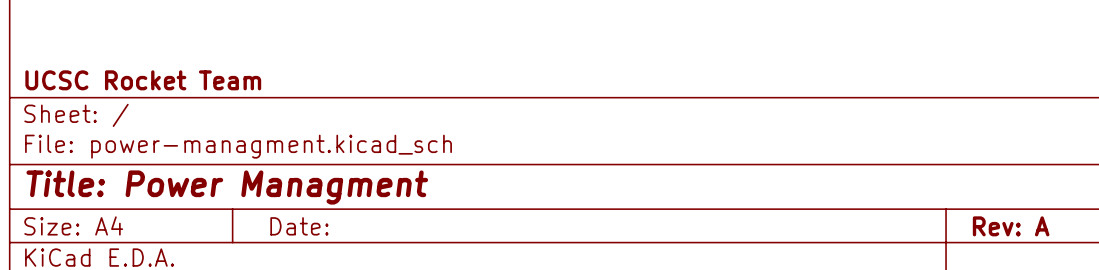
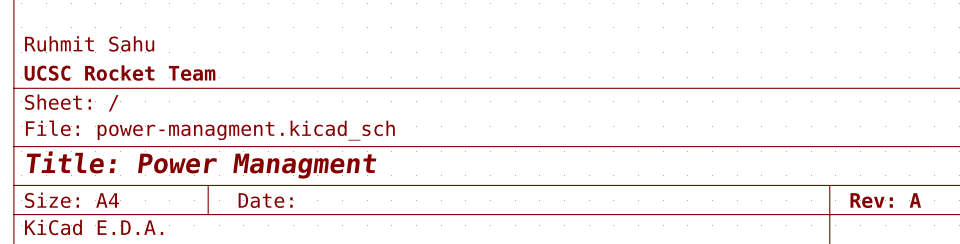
title block: none -> Ruhmit Sahu (89, 43)

